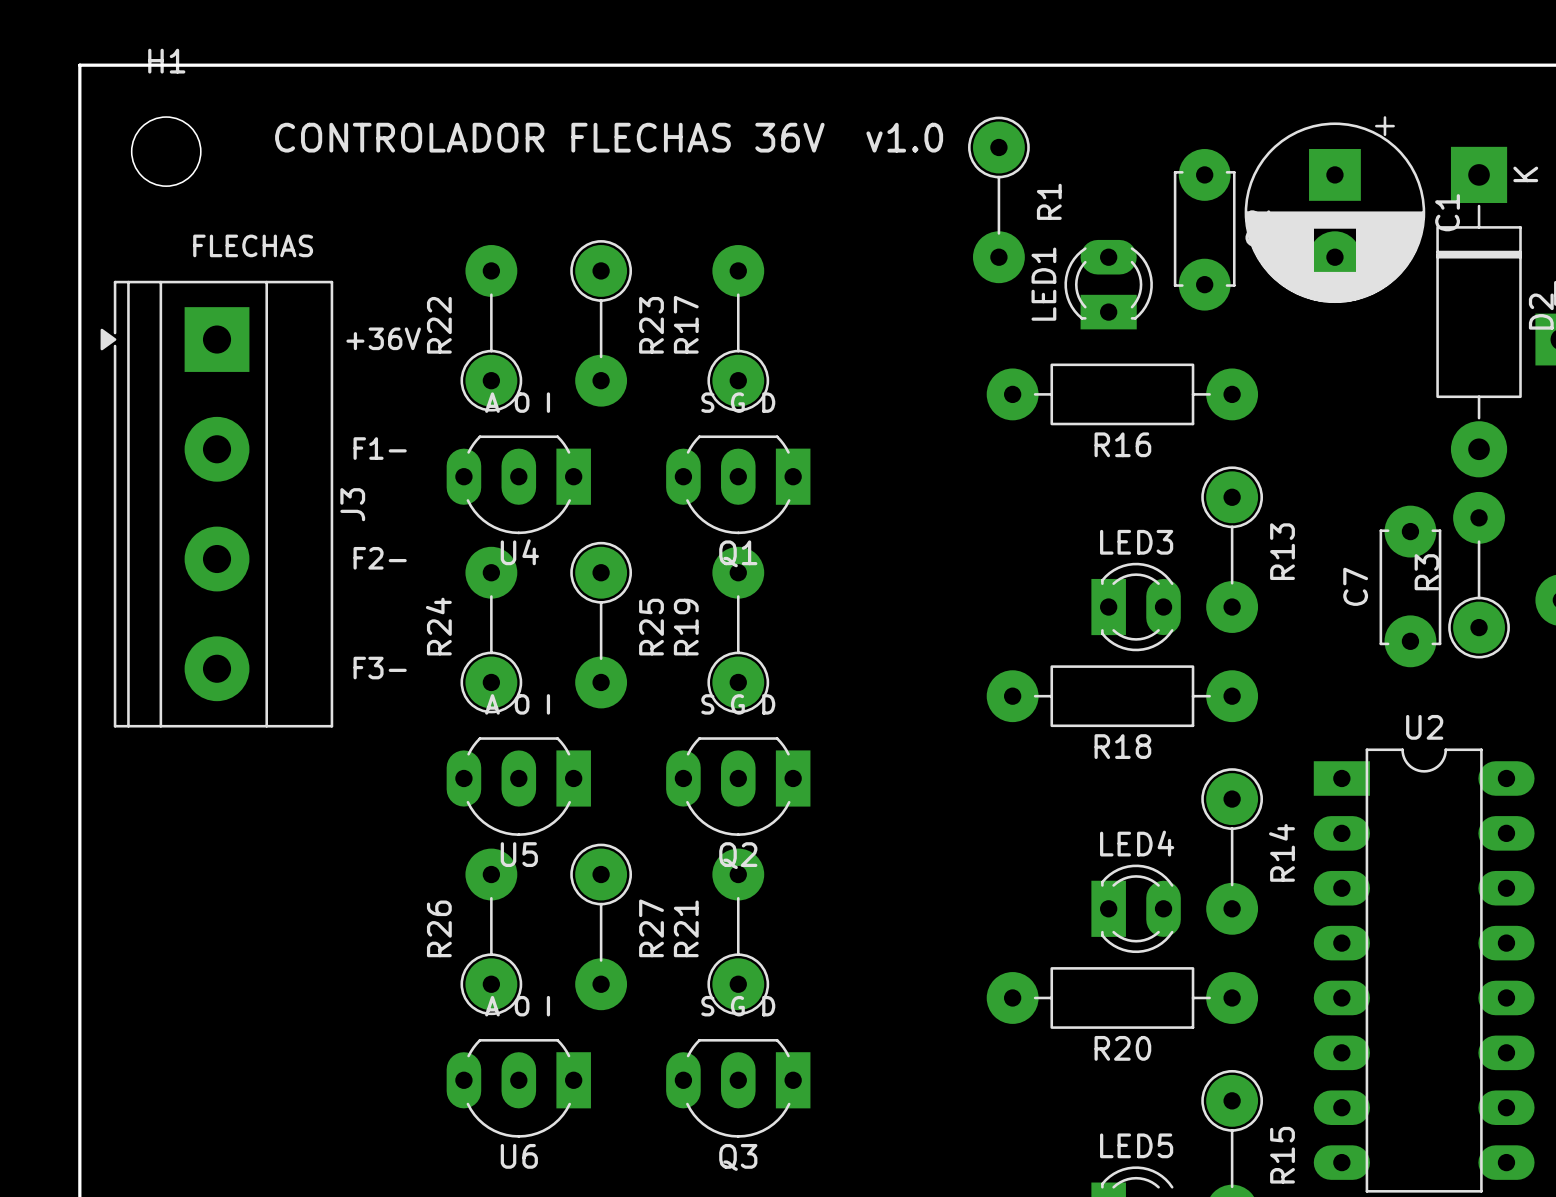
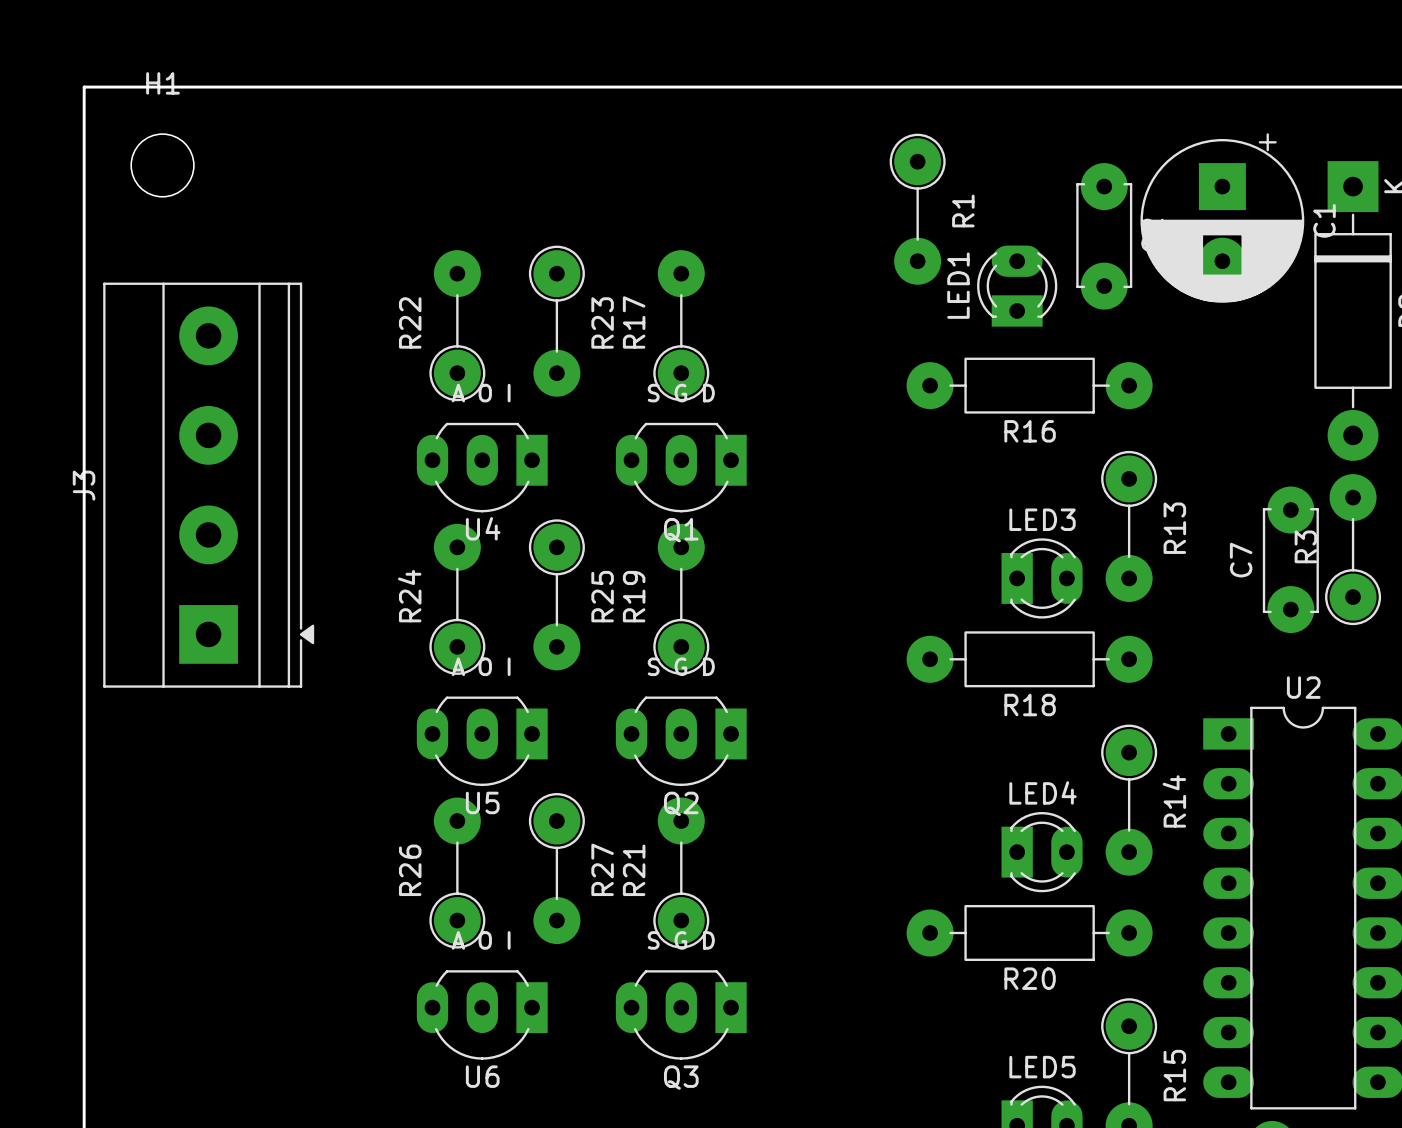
text: CONTROLADOR FLECHAS 36V v1.0 (609, 137) -> none
text: FLECHAS (253, 245) -> none
text: +36V (383, 338) -> none
text: F1- (380, 448) -> none
J3 rotation: 0° (216, 504) -> 180° (208, 485)
text: F2- (380, 558) -> none
text: F3- (380, 668) -> none

